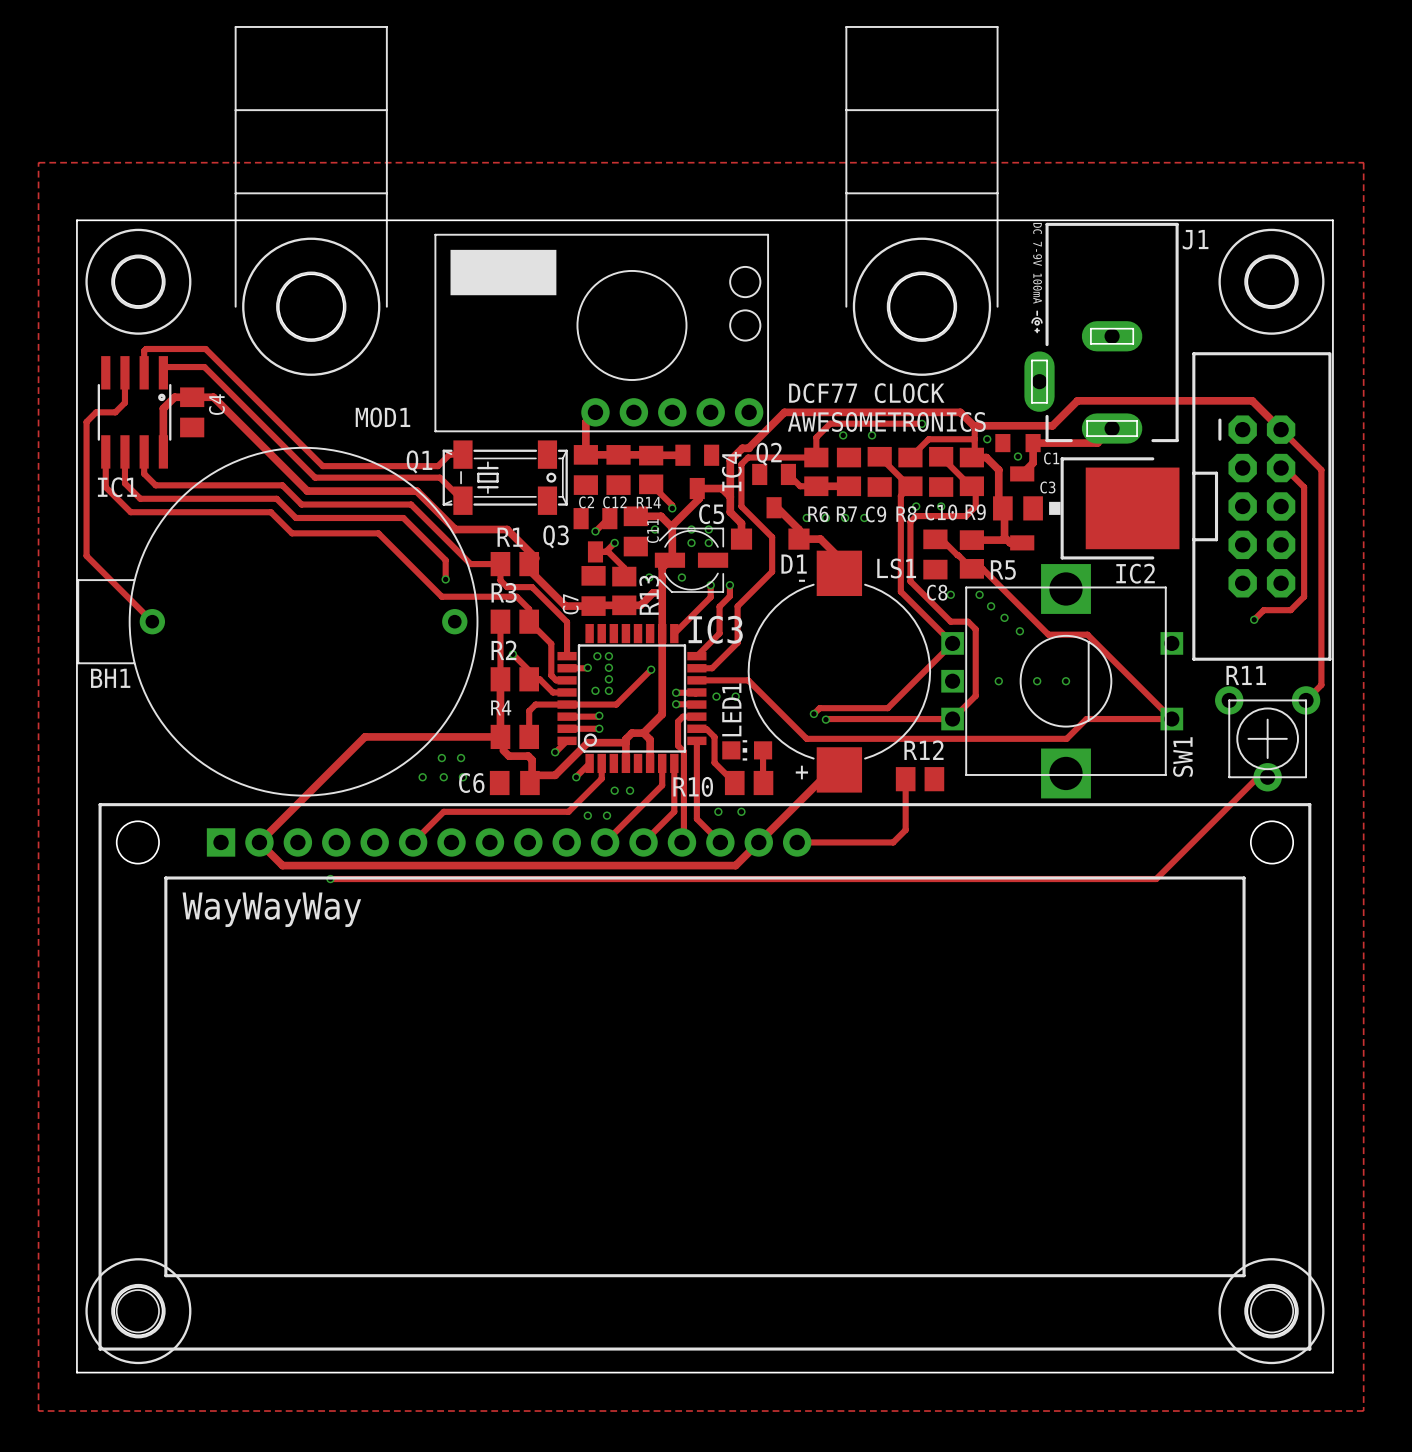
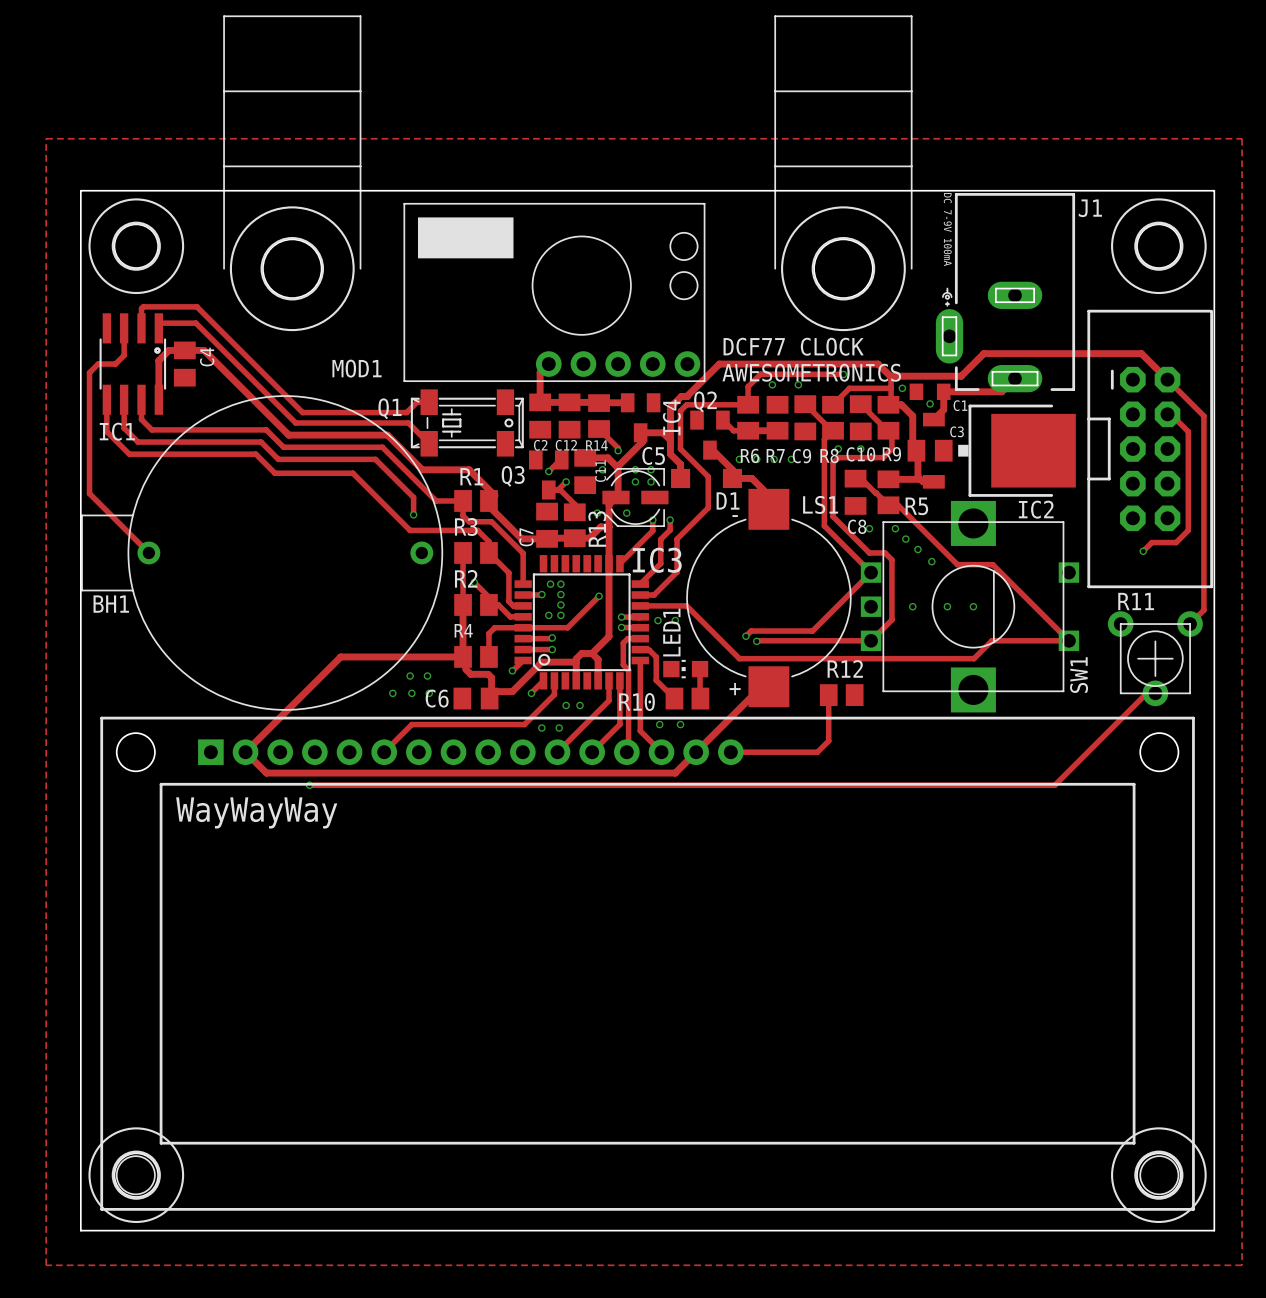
line: (1037, 311) (1037, 315) -> (947, 302) (947, 305)
line: (1032, 322) (1036, 318) (1041, 322) -> (942, 297) (947, 292) (951, 297)
drawing position: (1037, 322) -> (947, 297)
line: (1035, 330) (1039, 330) -> (945, 304) (949, 304)

